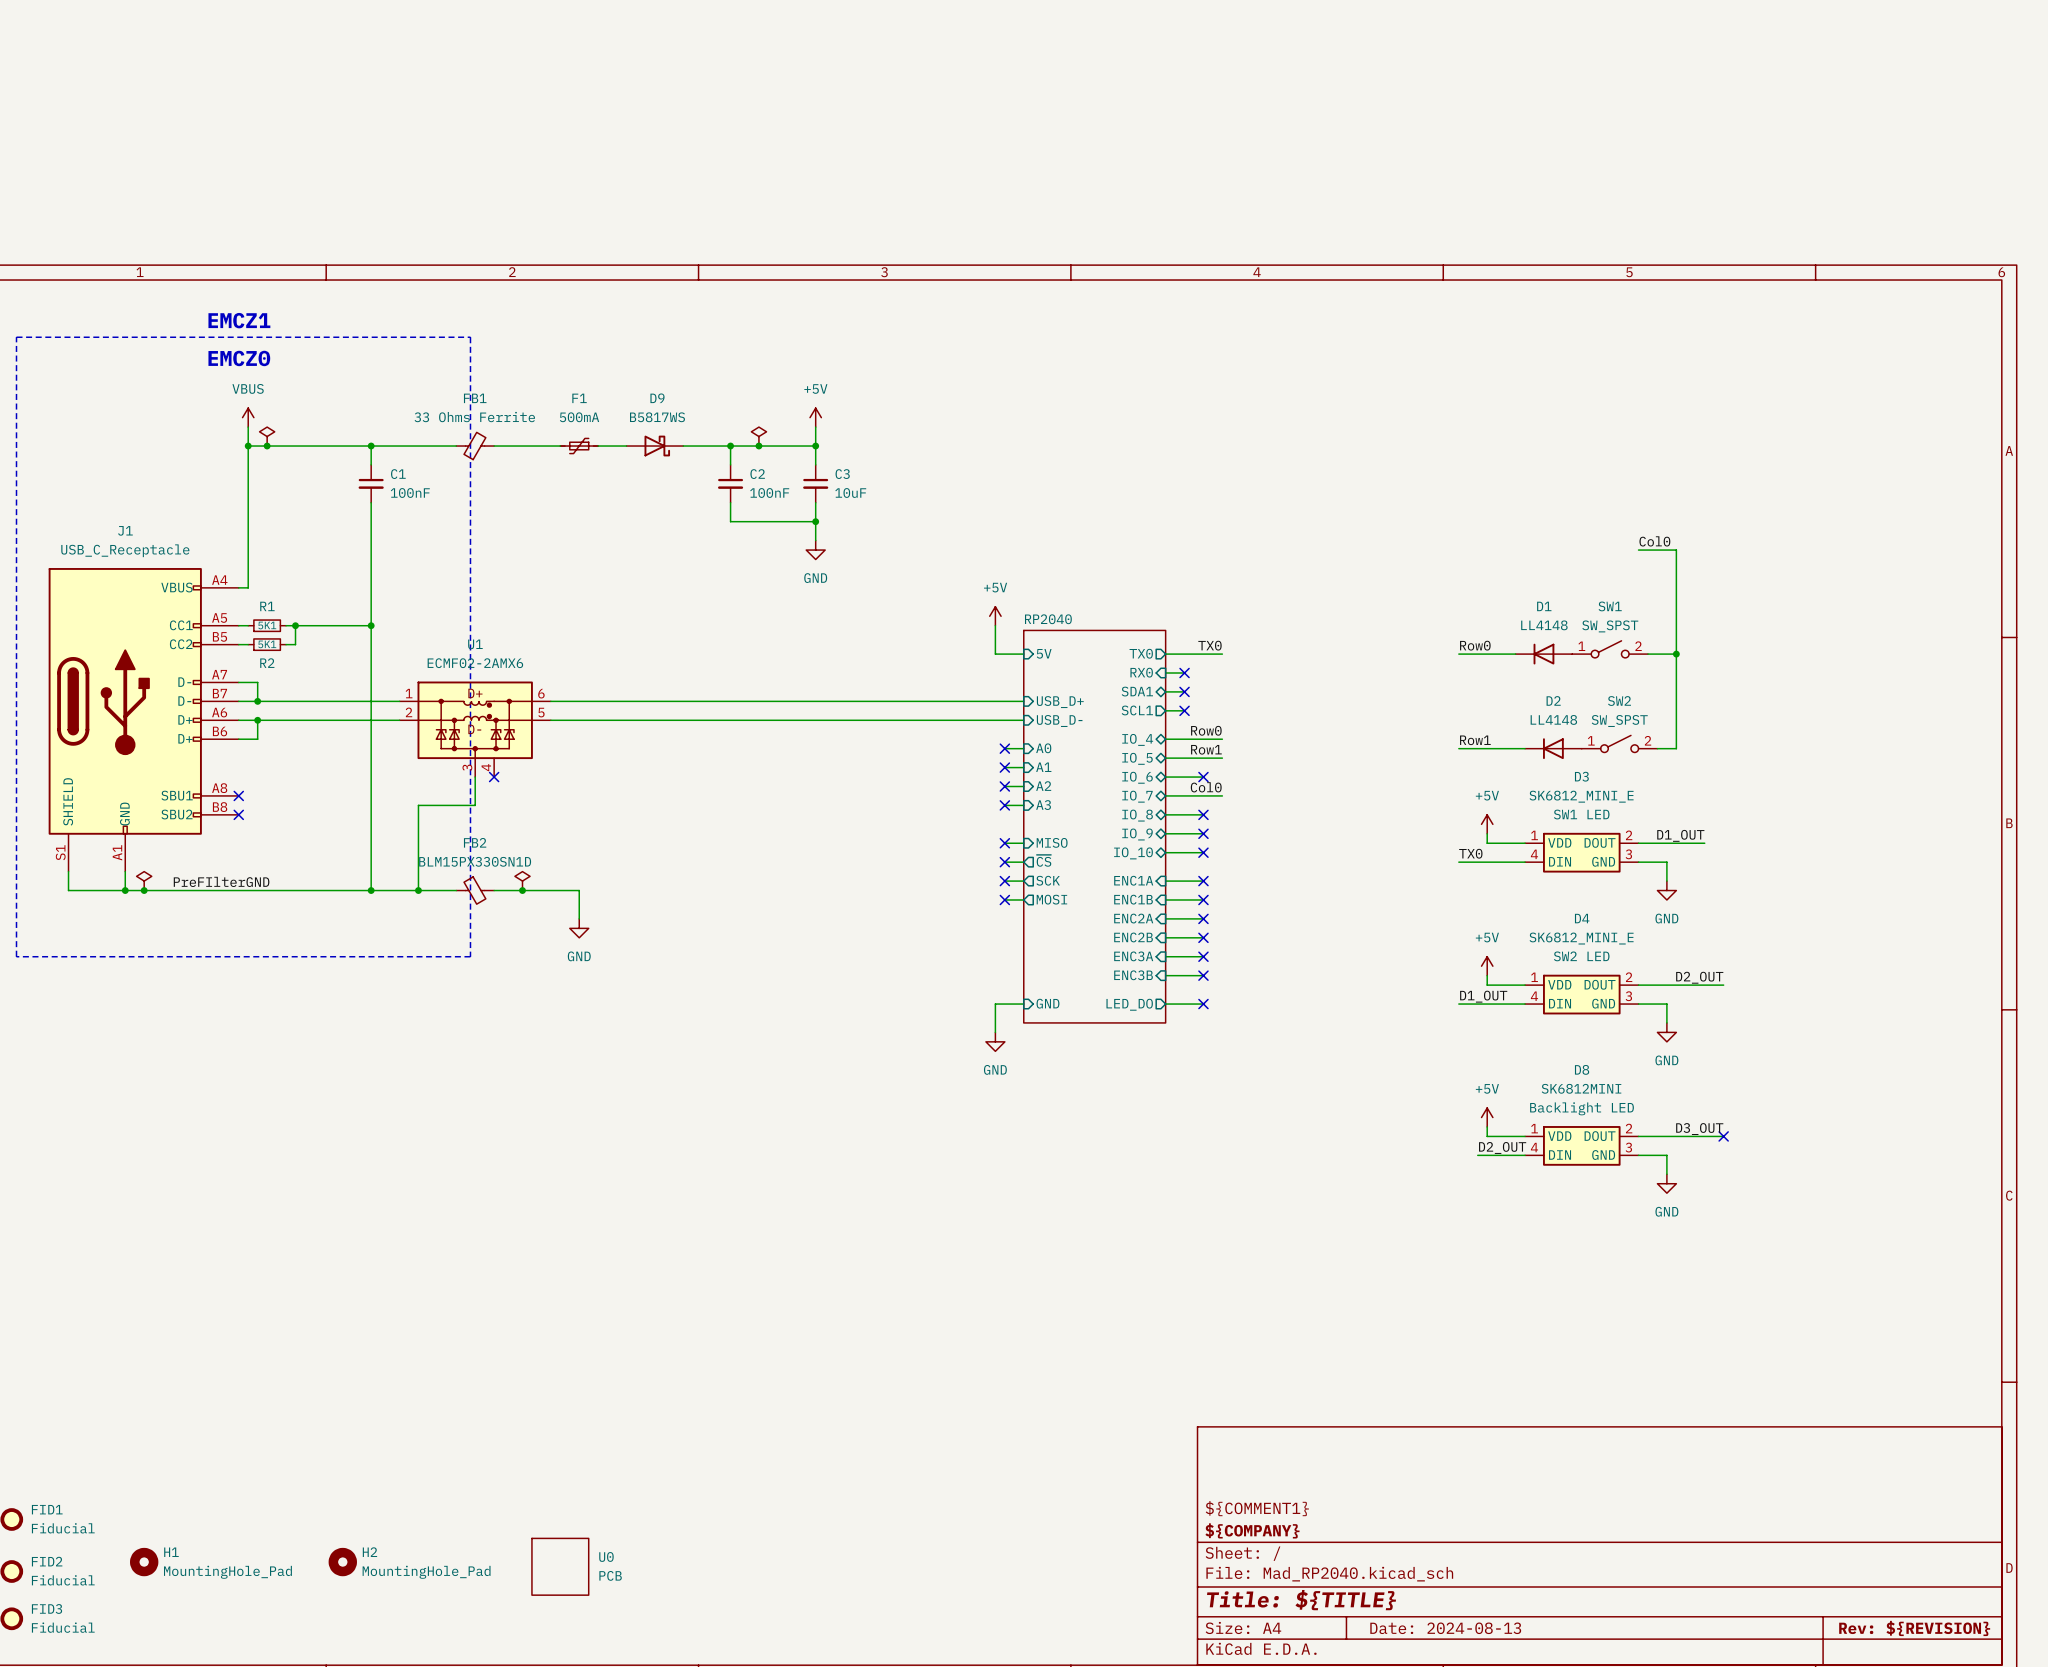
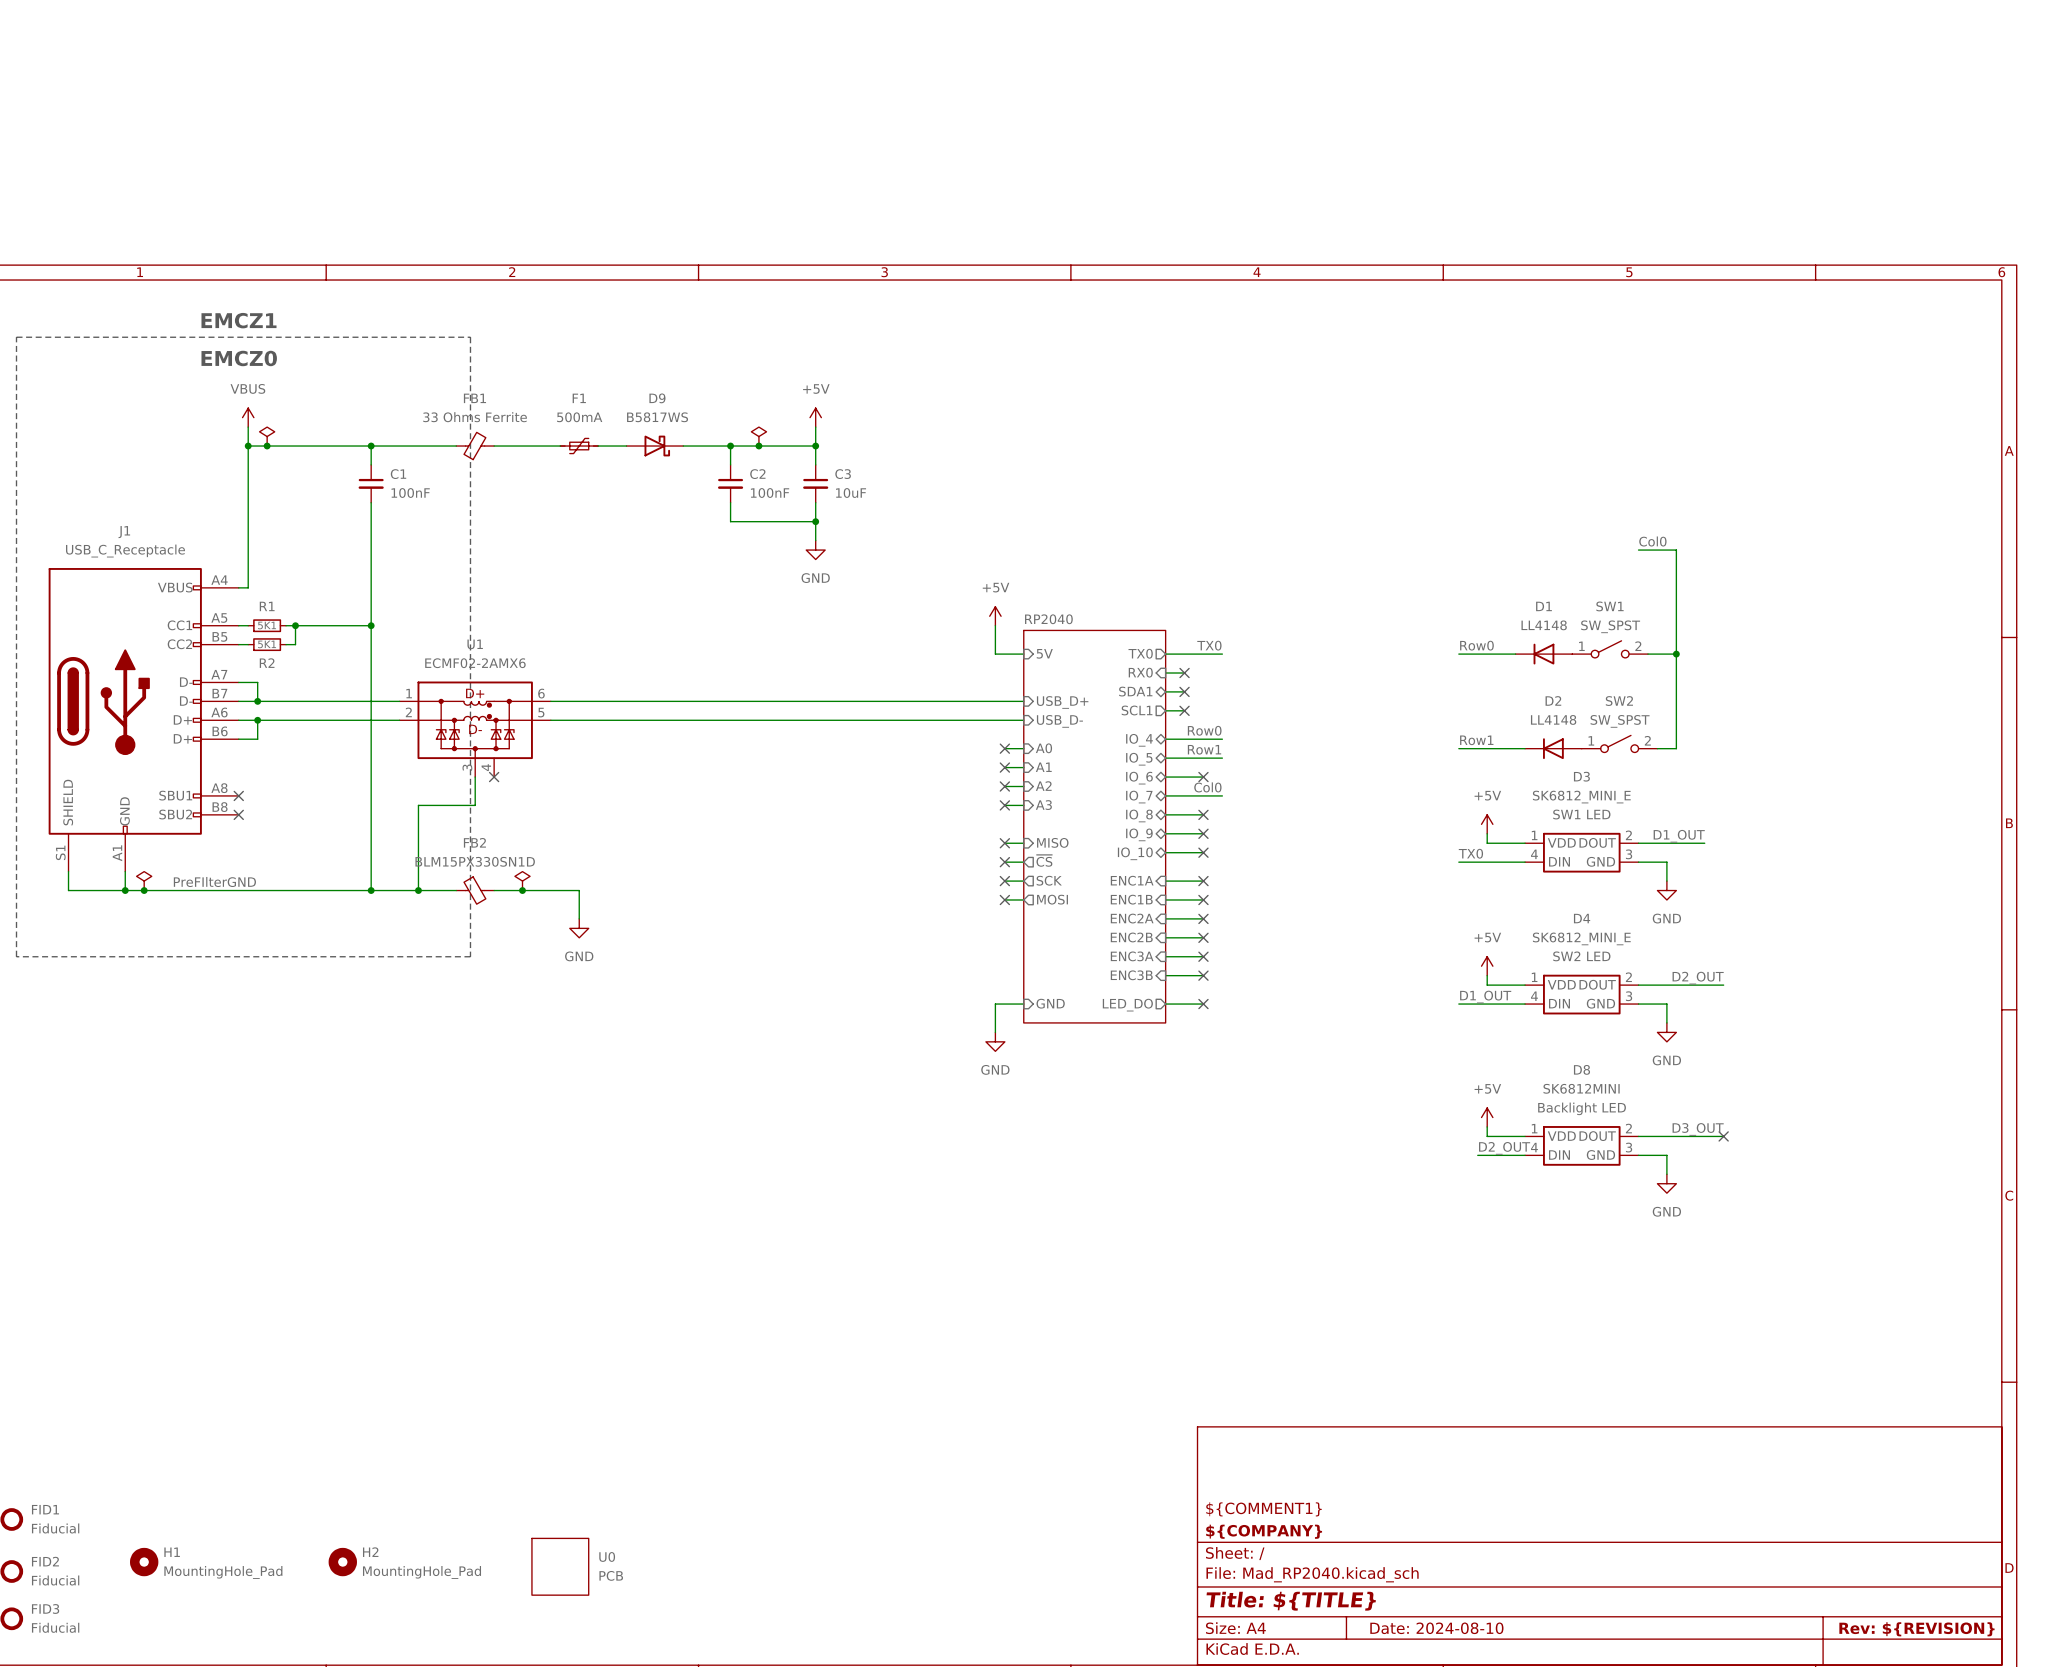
title block: Date: 2024-08-13 (1445, 1628) -> Date: 2024-08-10 (1436, 1628)

